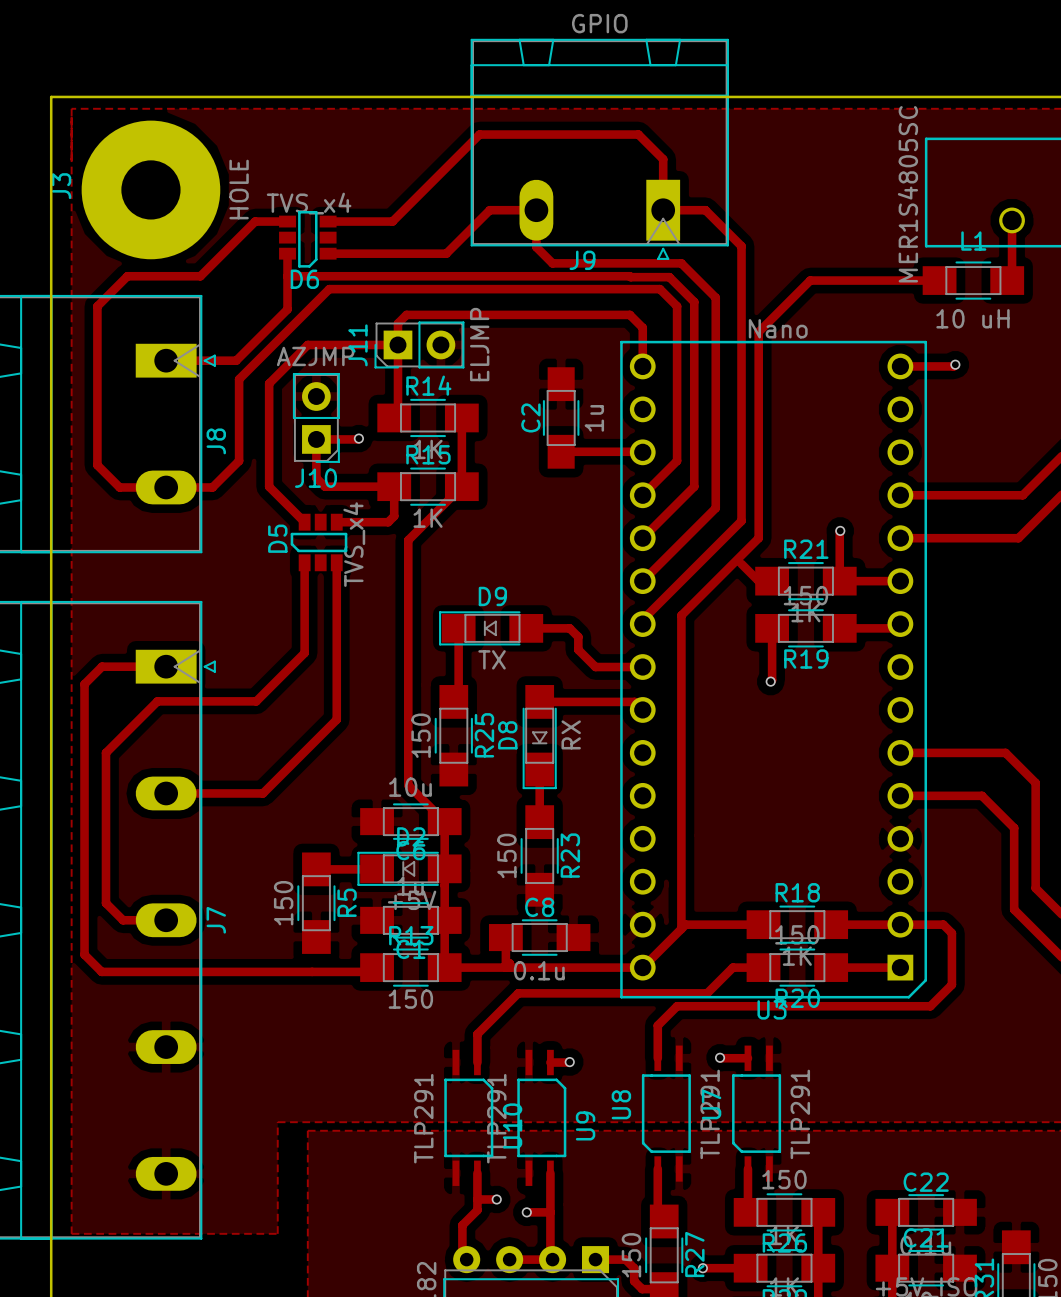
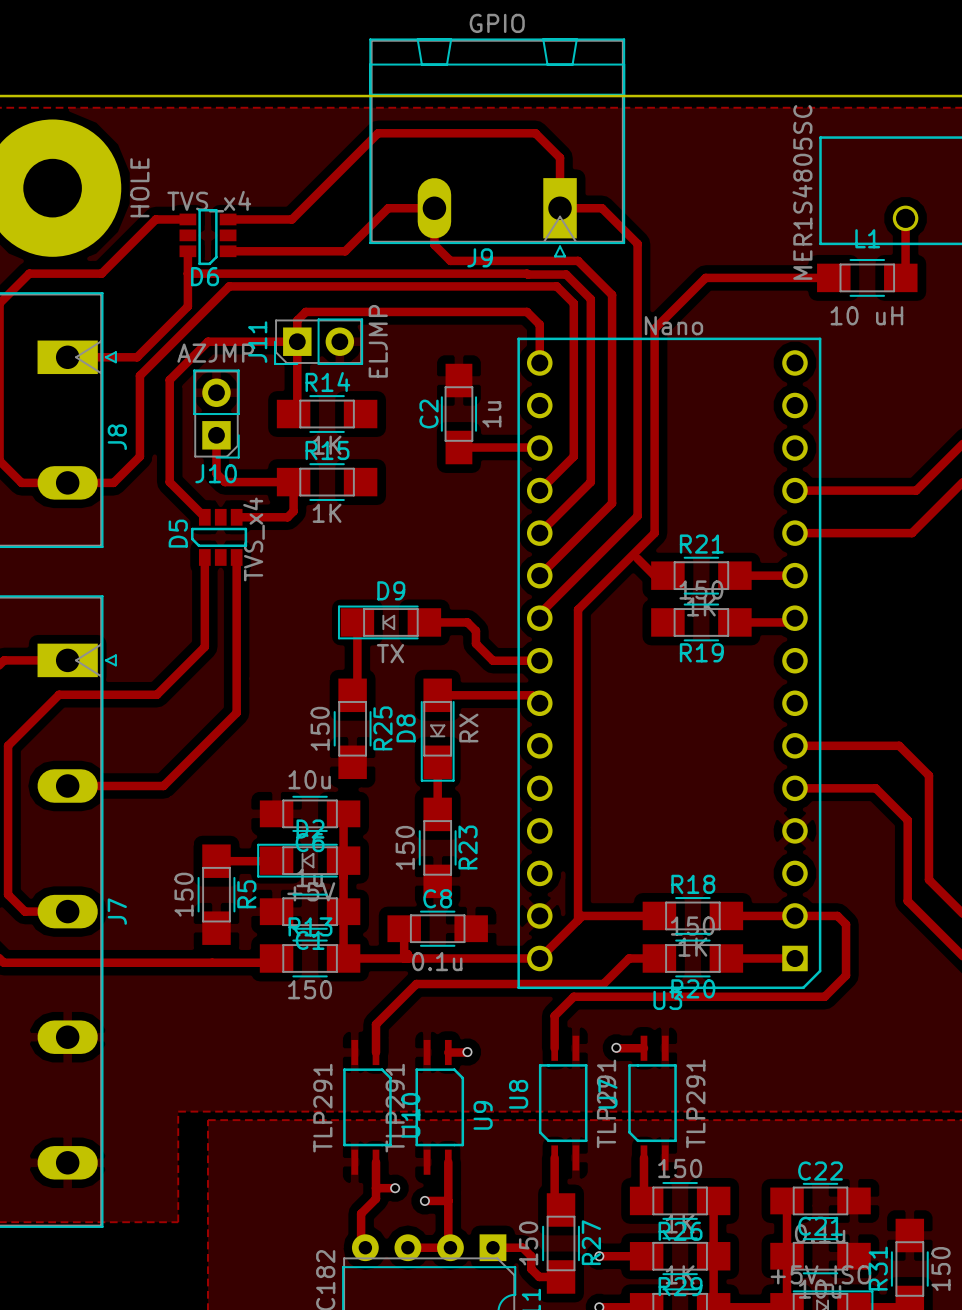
track: (955, 364) (953, 366) (900, 366) -> none
via: (955, 364) -> none
track: (461, 417) (461, 486) (408, 540) (408, 785) (444, 821) -> none
track: (358, 438) (316, 439) -> none
via: (358, 438) -> none
track: (840, 530) (839, 581) -> none
via: (840, 530) -> none
track: (772, 628) (770, 681) -> none
via: (770, 681) -> none

